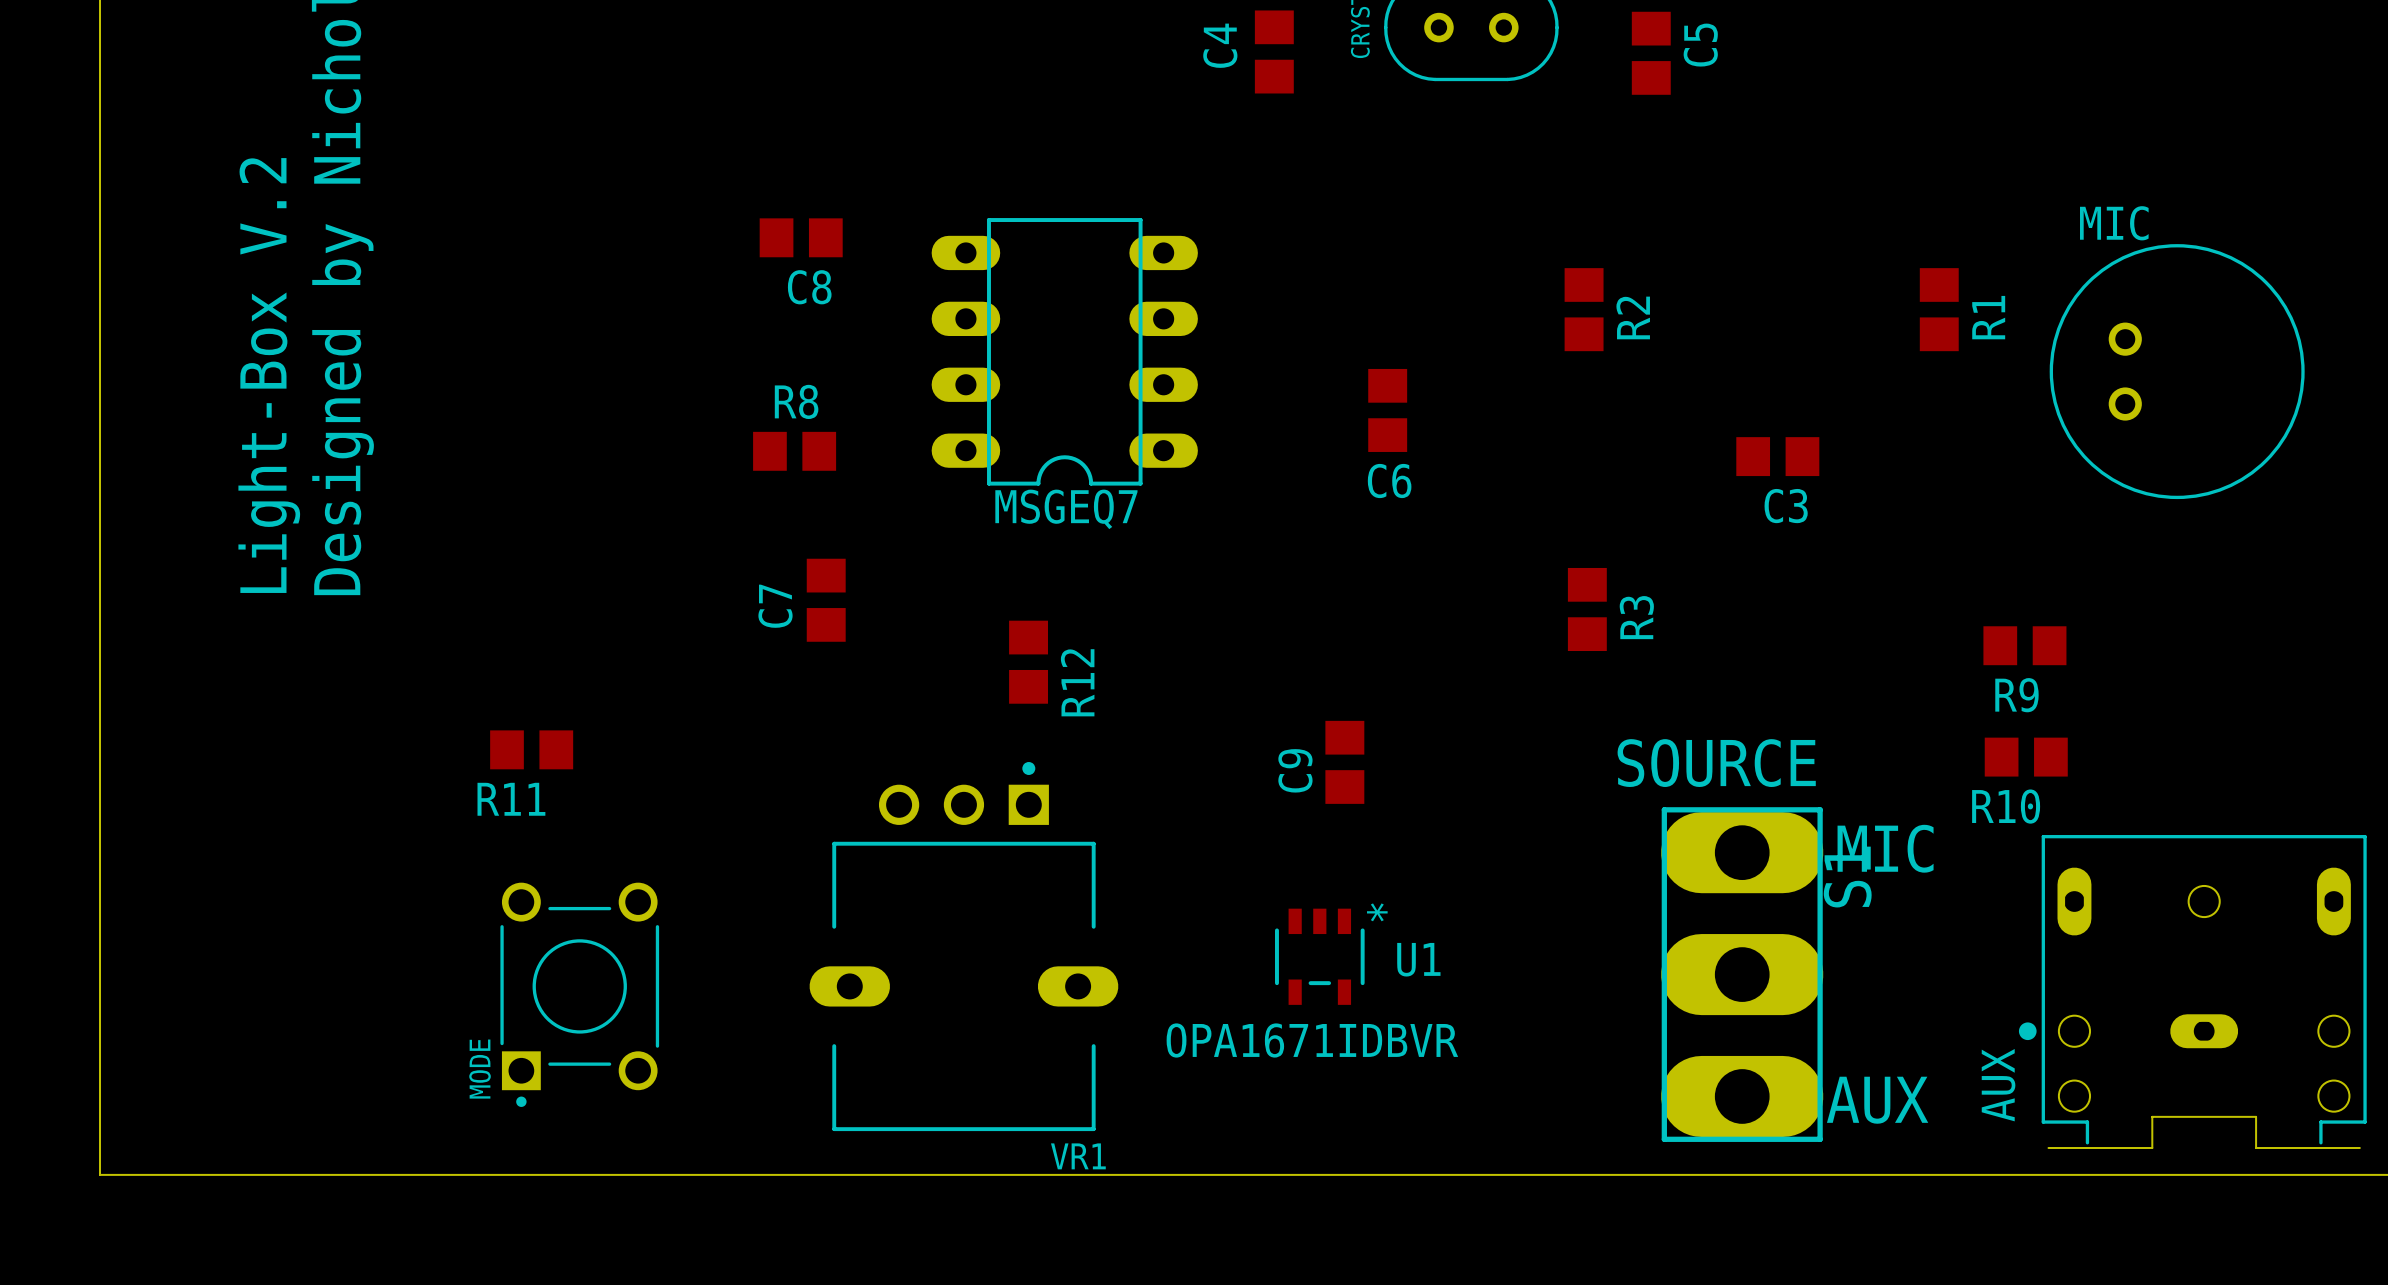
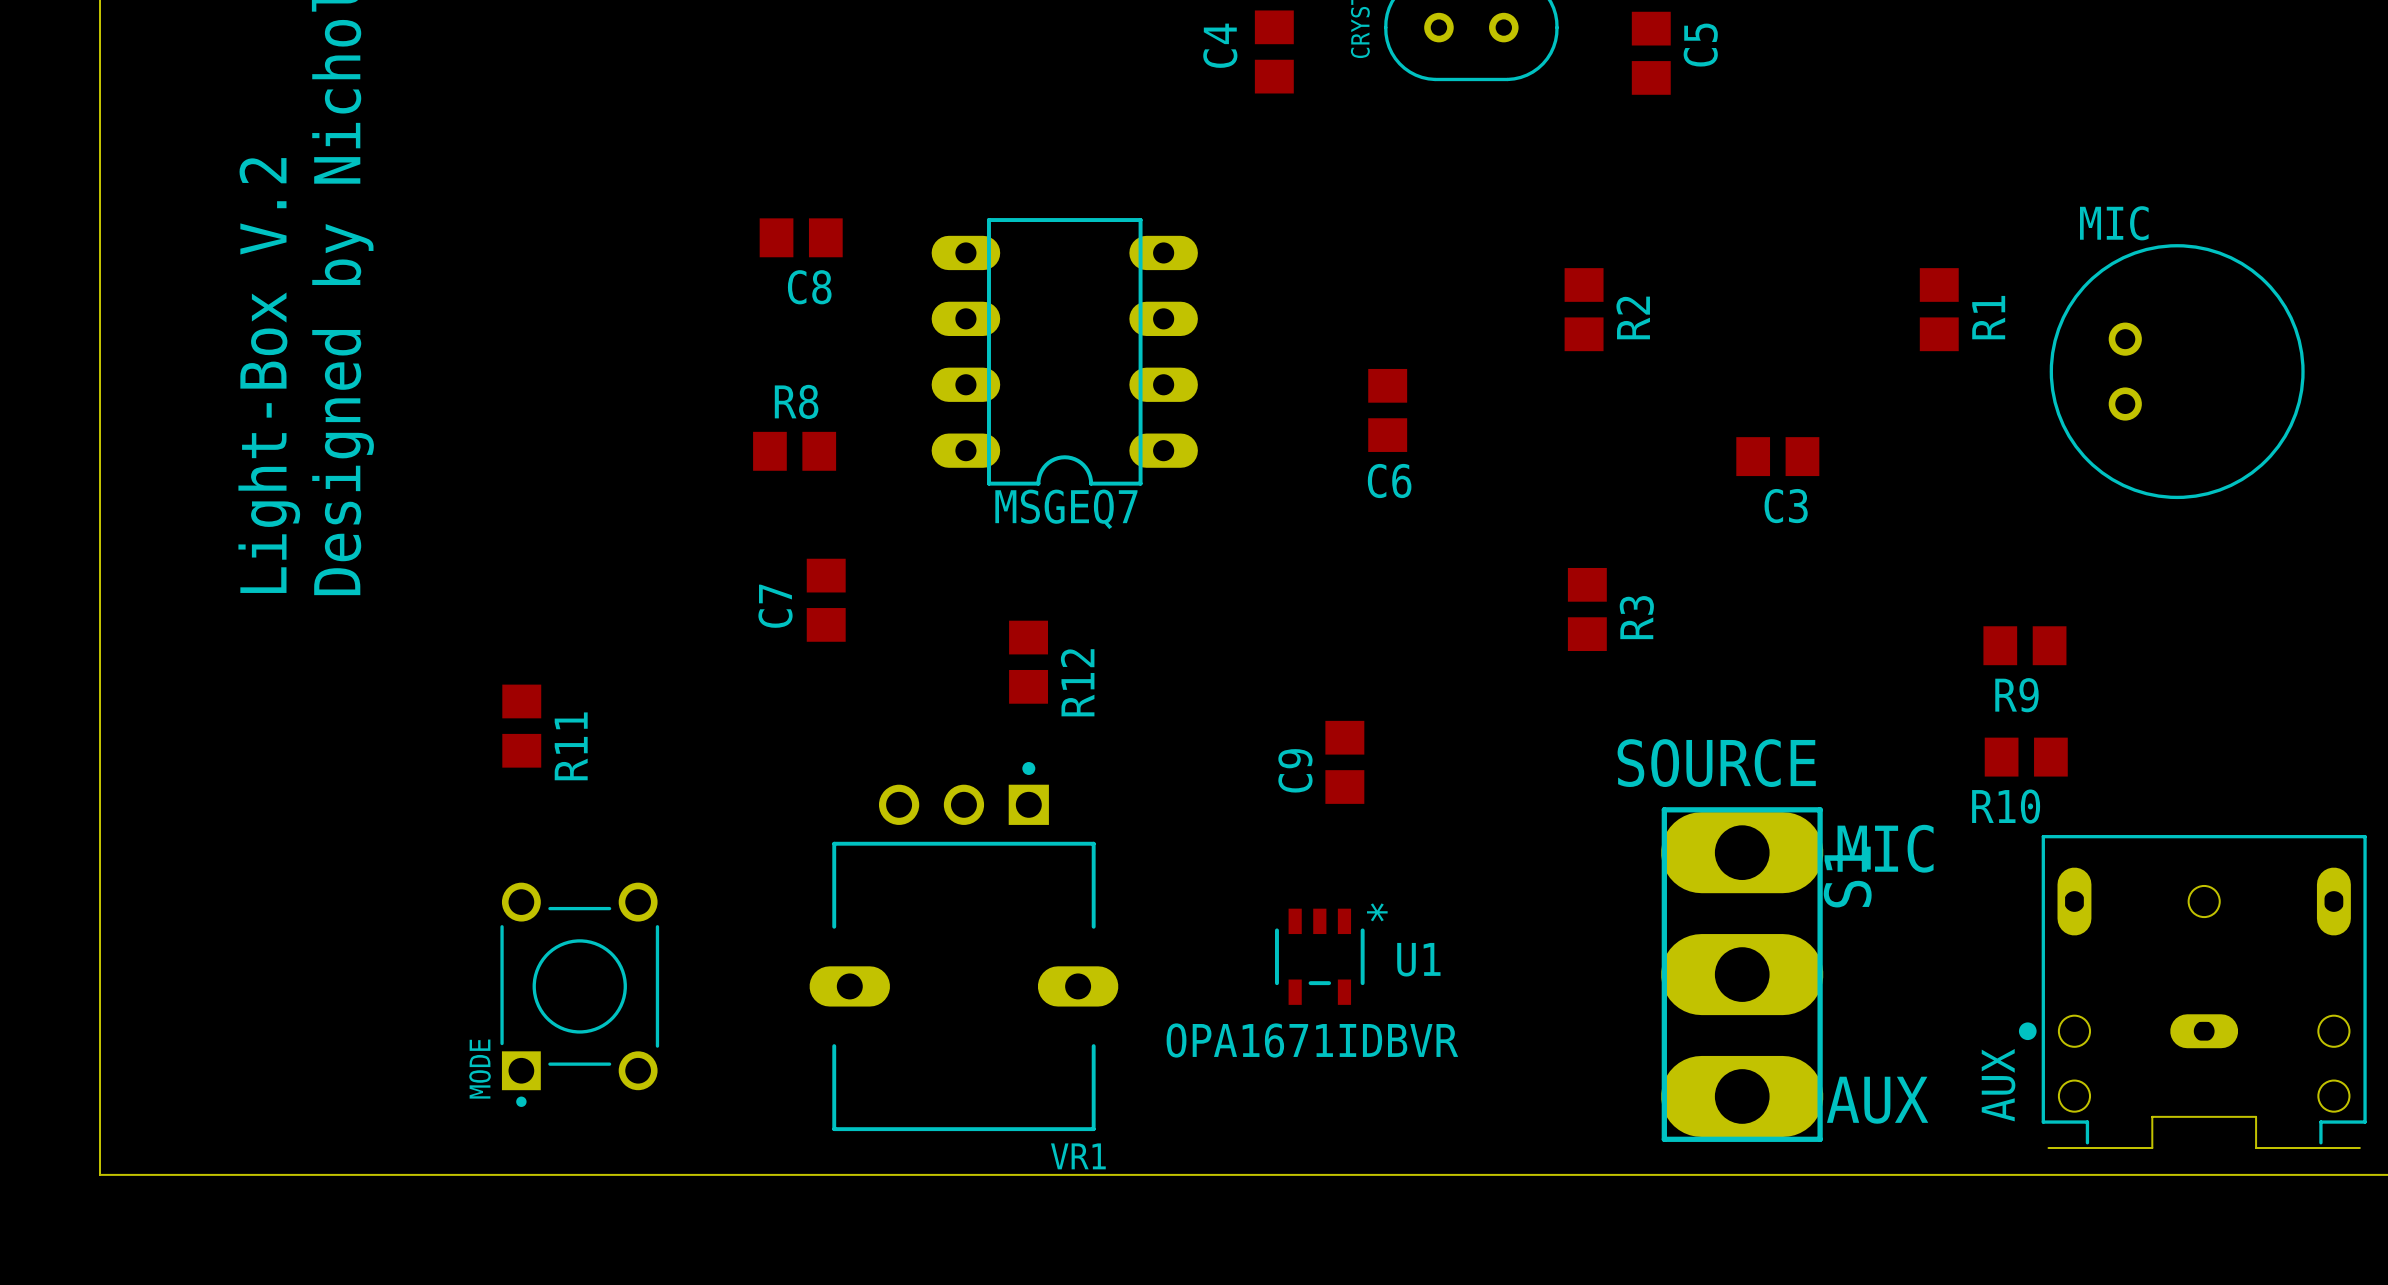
R11 rotation: 0° (531, 749) -> 90° clockwise (521, 726)
R11 name position: R11 (511, 799) -> R11 (571, 746)

